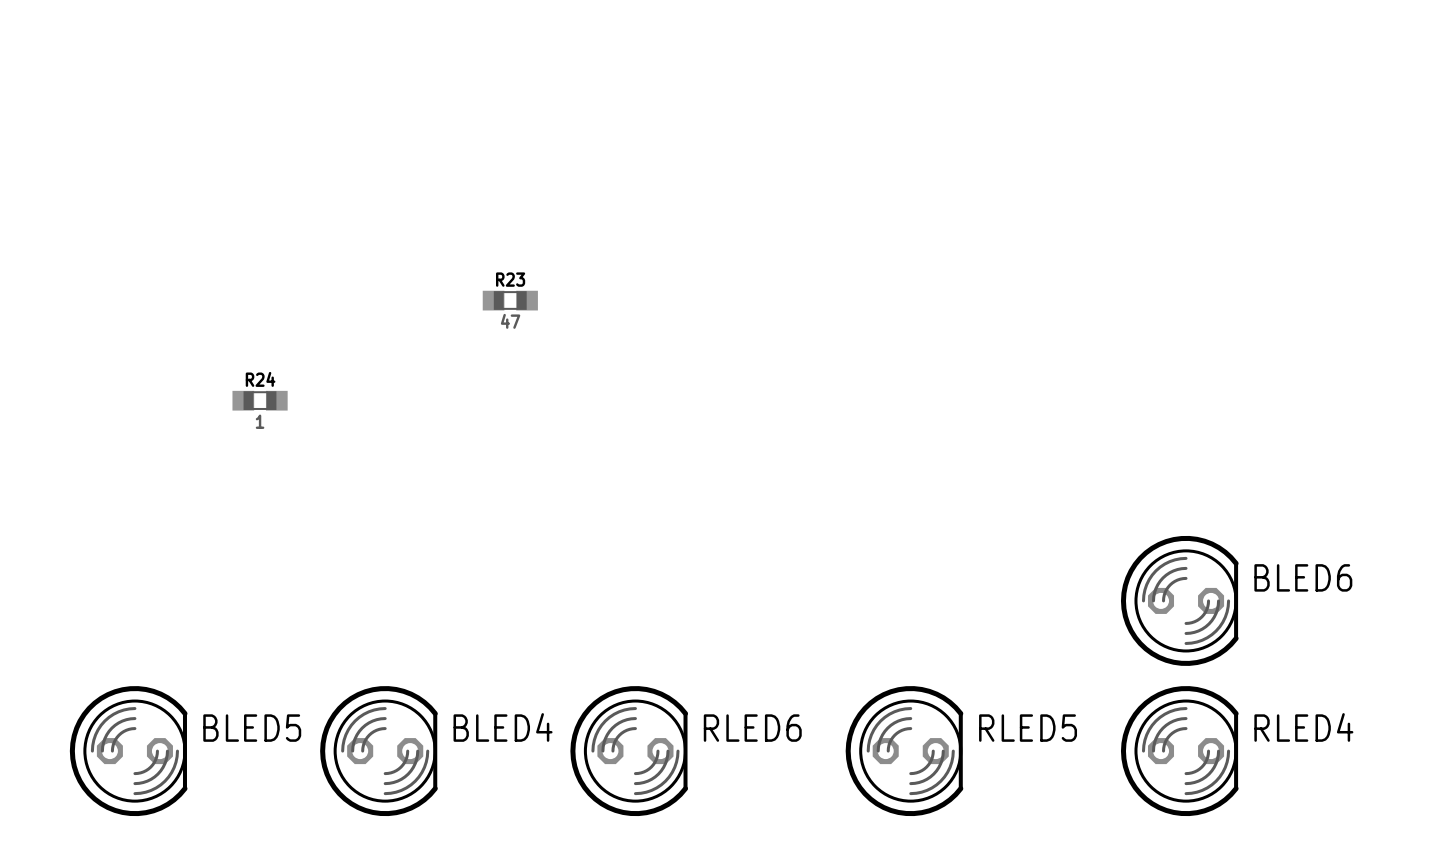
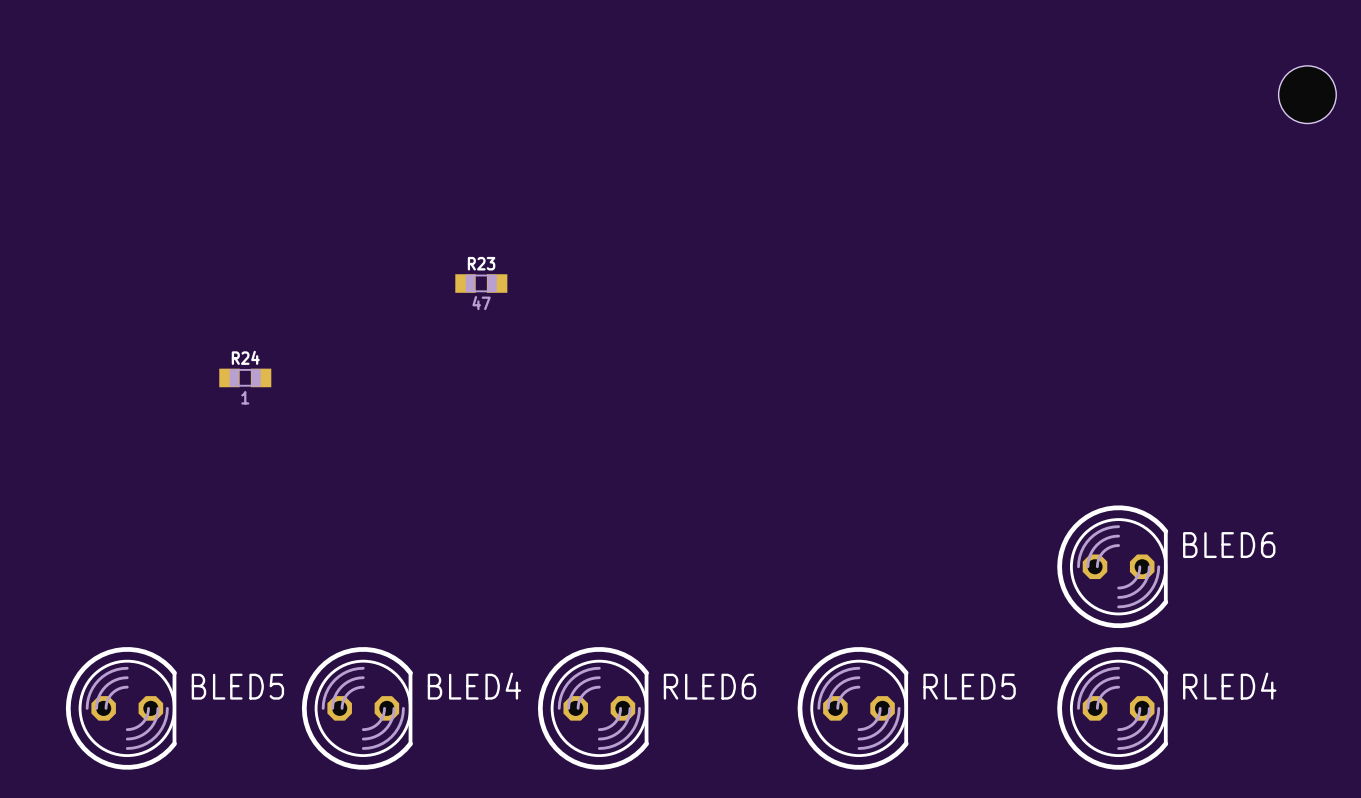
hole: none -> (1307, 94)

